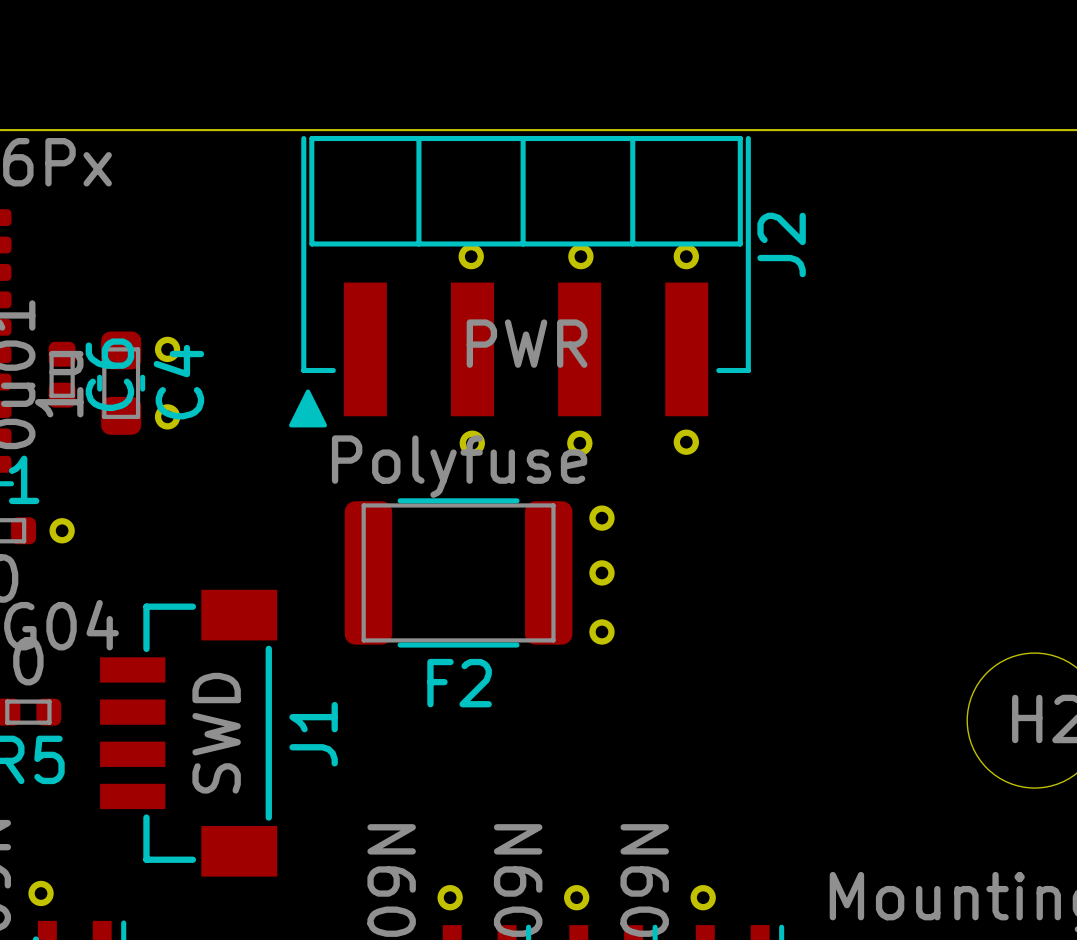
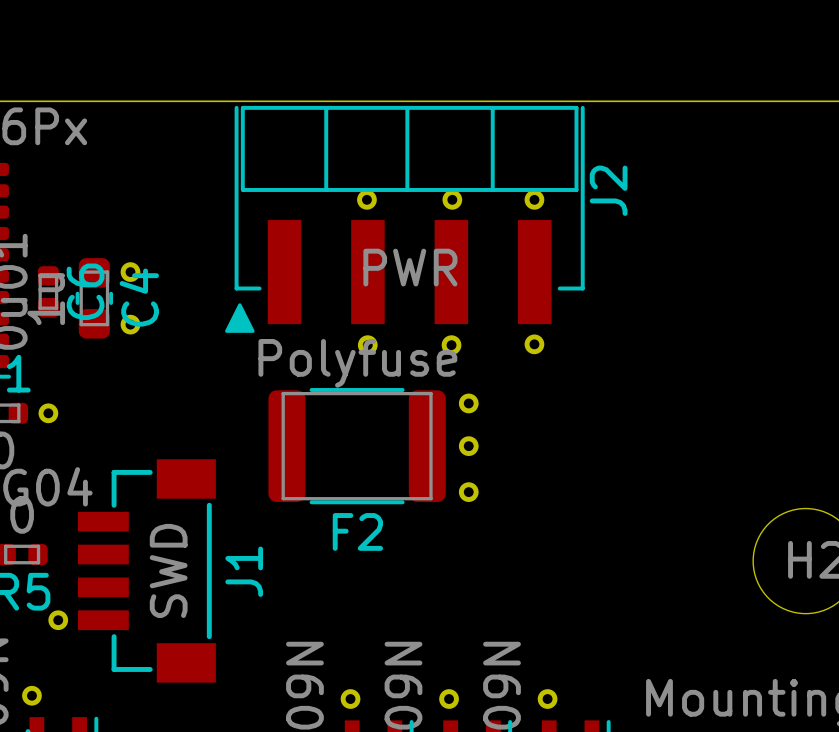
part: none -> (58, 620)

